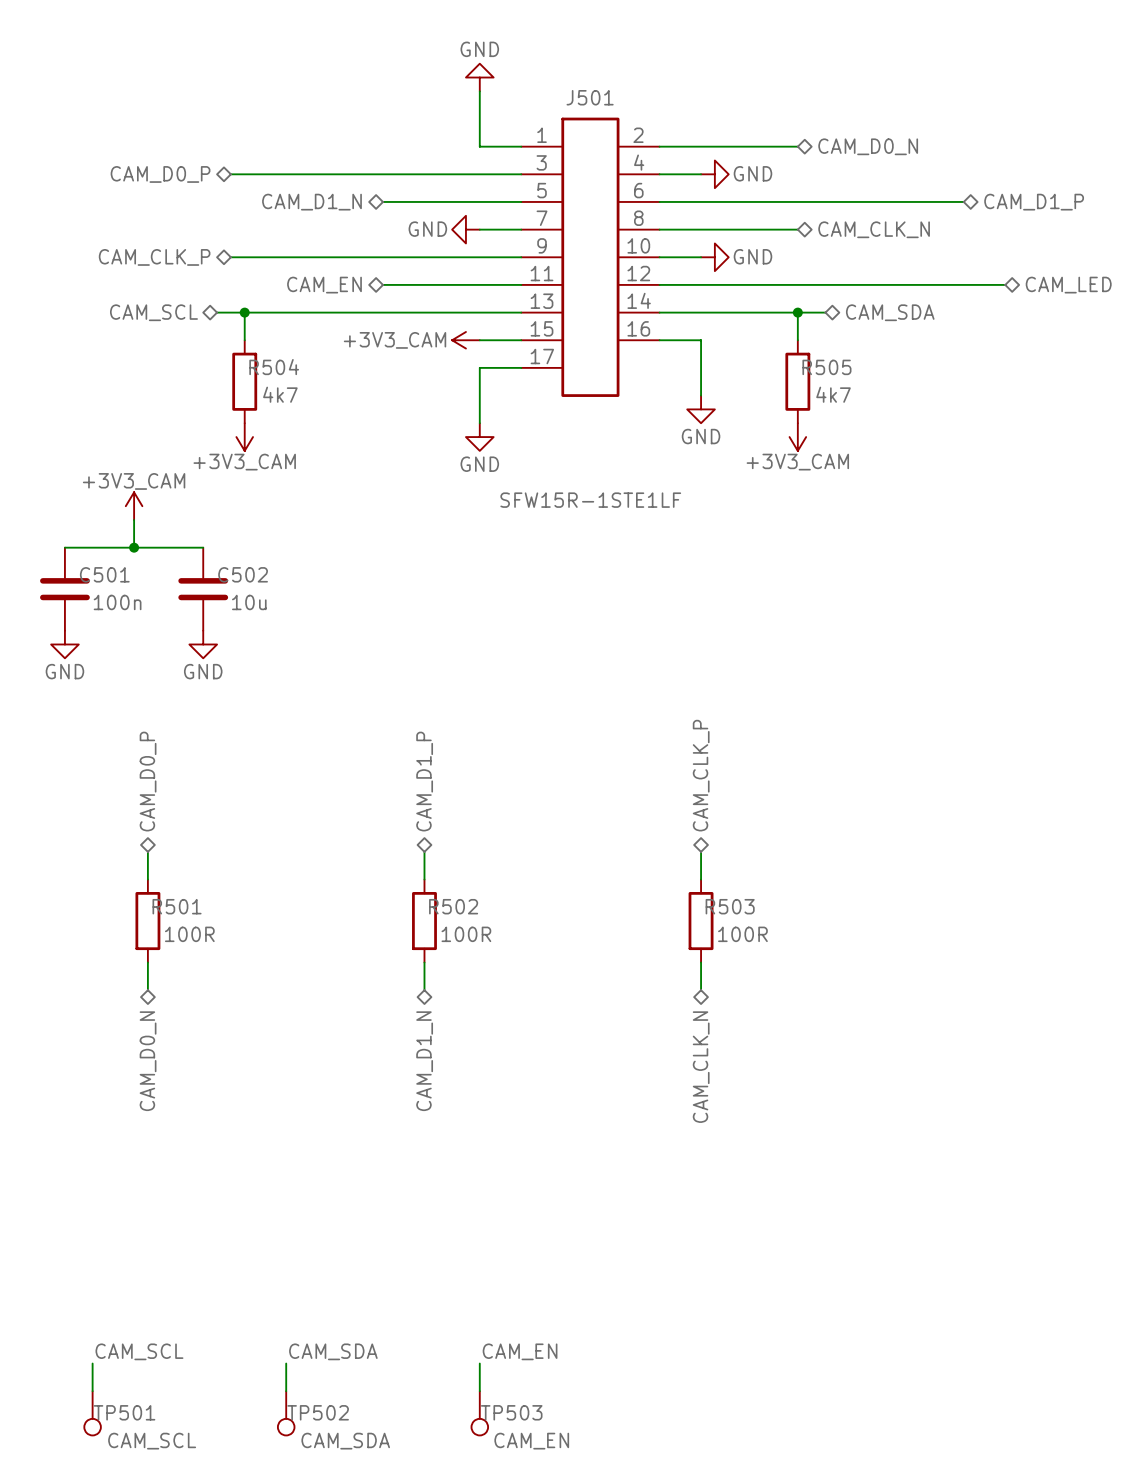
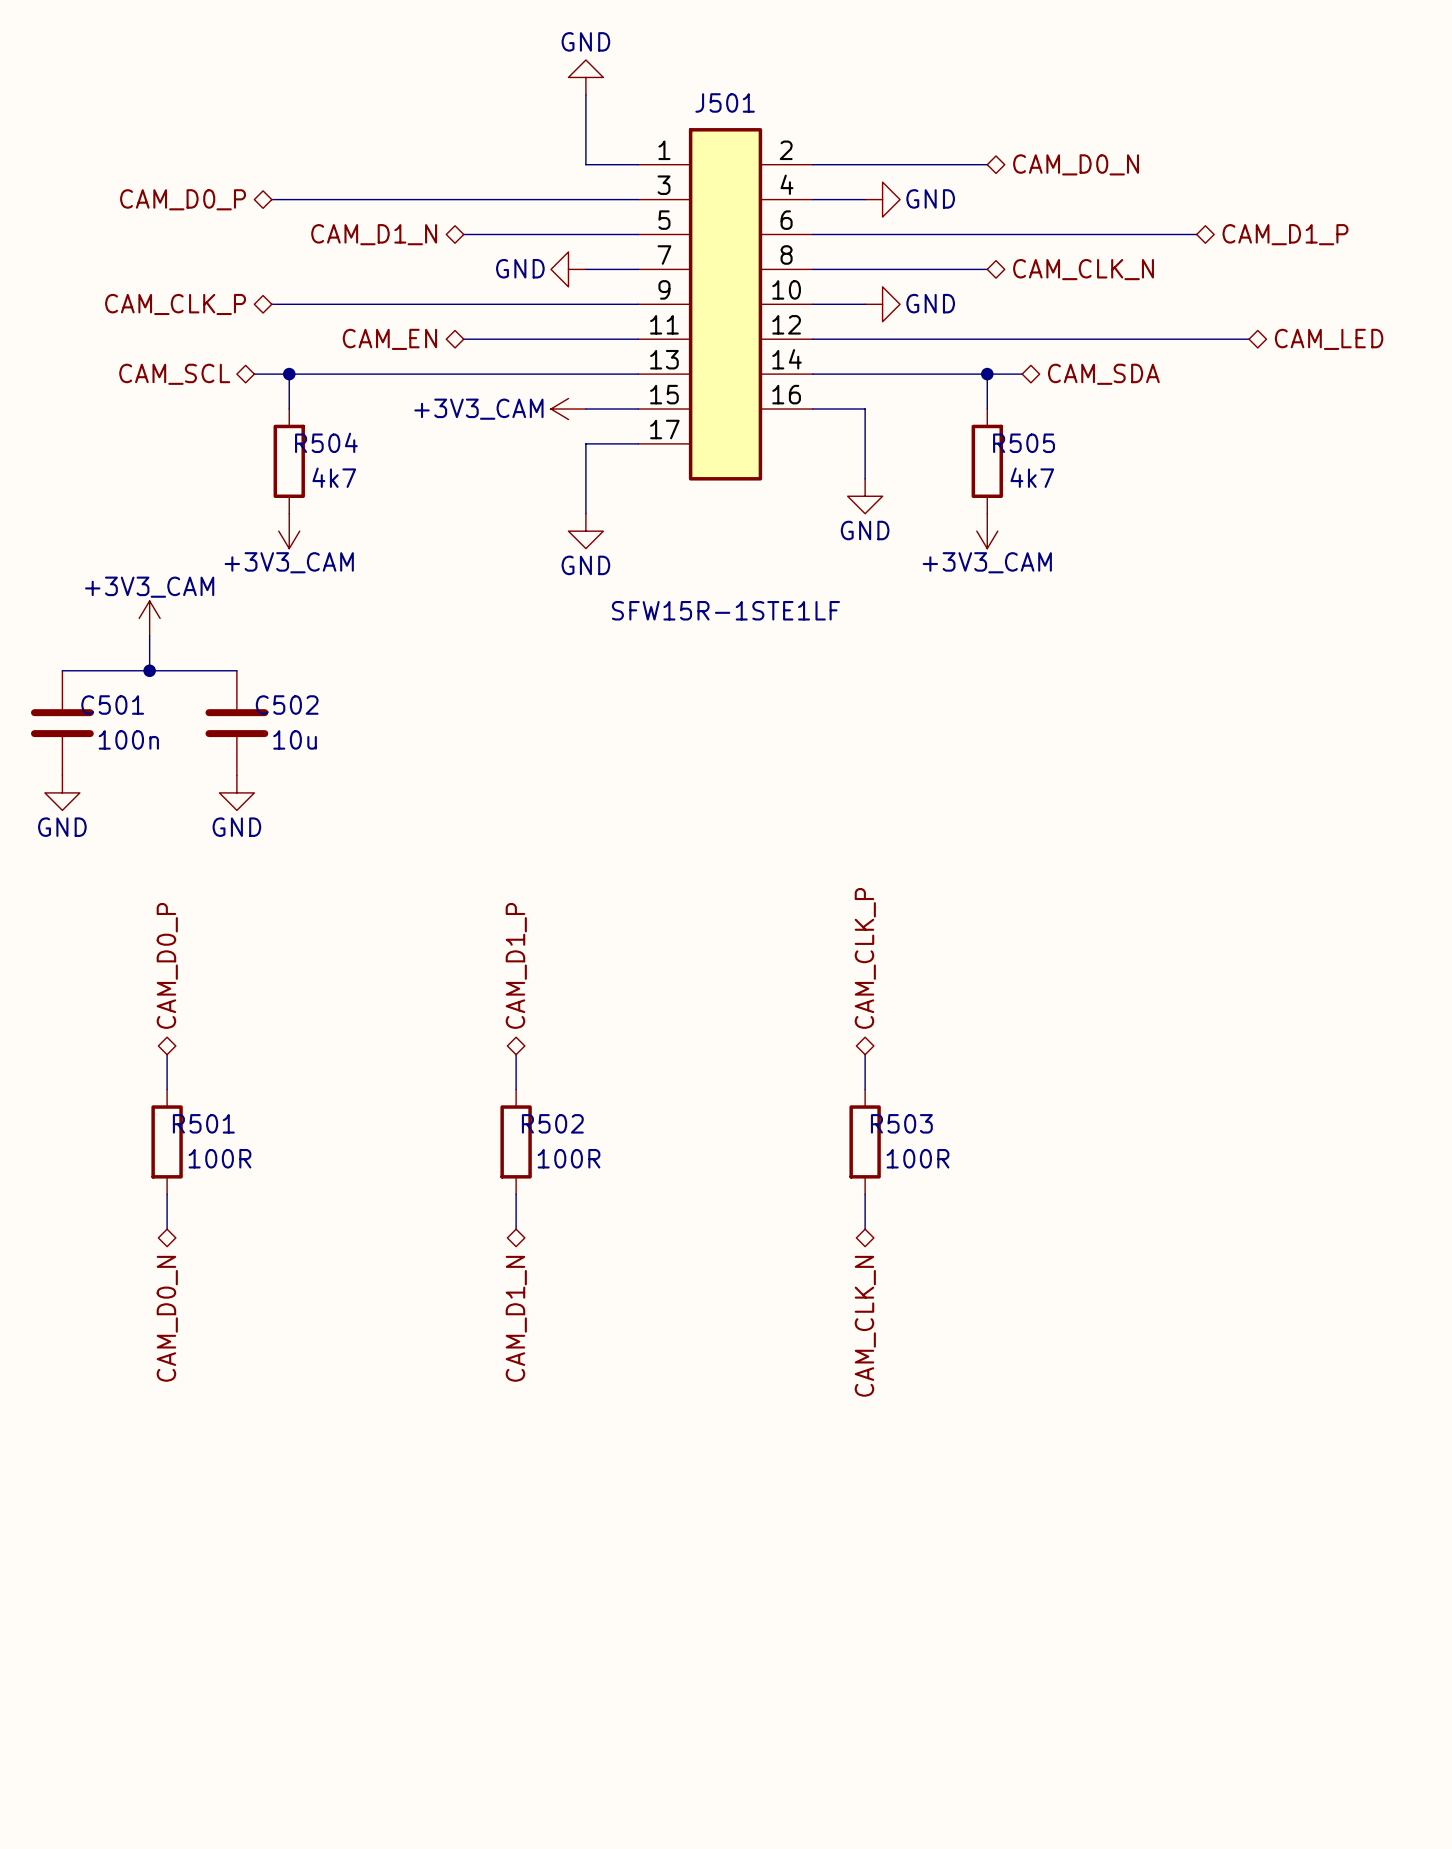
label: CAM_SCL (139, 1351) -> none
label: CAM_SDA (333, 1351) -> none
label: CAM_EN (520, 1351) -> none
wire: (92, 1363) (92, 1391) -> none
wire: (286, 1363) (286, 1391) -> none
wire: (479, 1363) (479, 1391) -> none
TP501: CAM_SCL (92, 1413) -> none
TP502: CAM_SDA (286, 1413) -> none
TP503: CAM_EN (479, 1413) -> none

